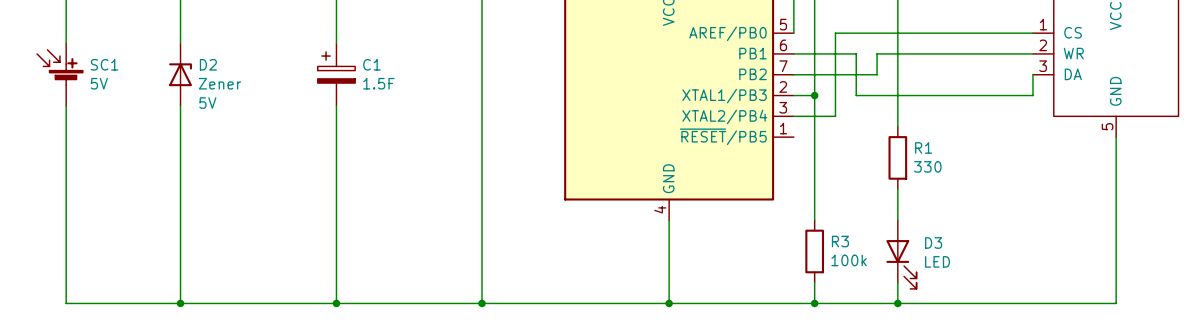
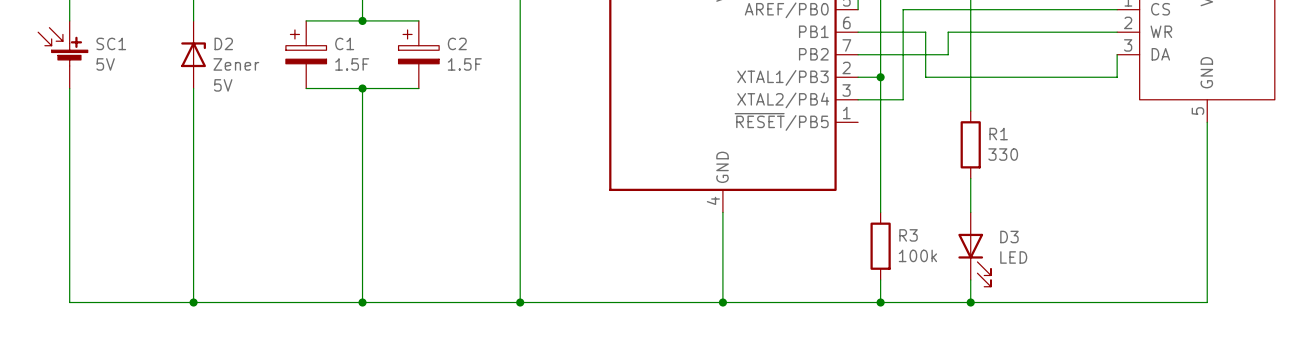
wire: none -> (306, 20) (418, 20)
junction: none -> (362, 20)
C1 position: (336, 74) -> (306, 54)
C2: none -> 1.5F (418, 54)
wire: none -> (306, 88) (418, 88)
junction: none -> (362, 88)

